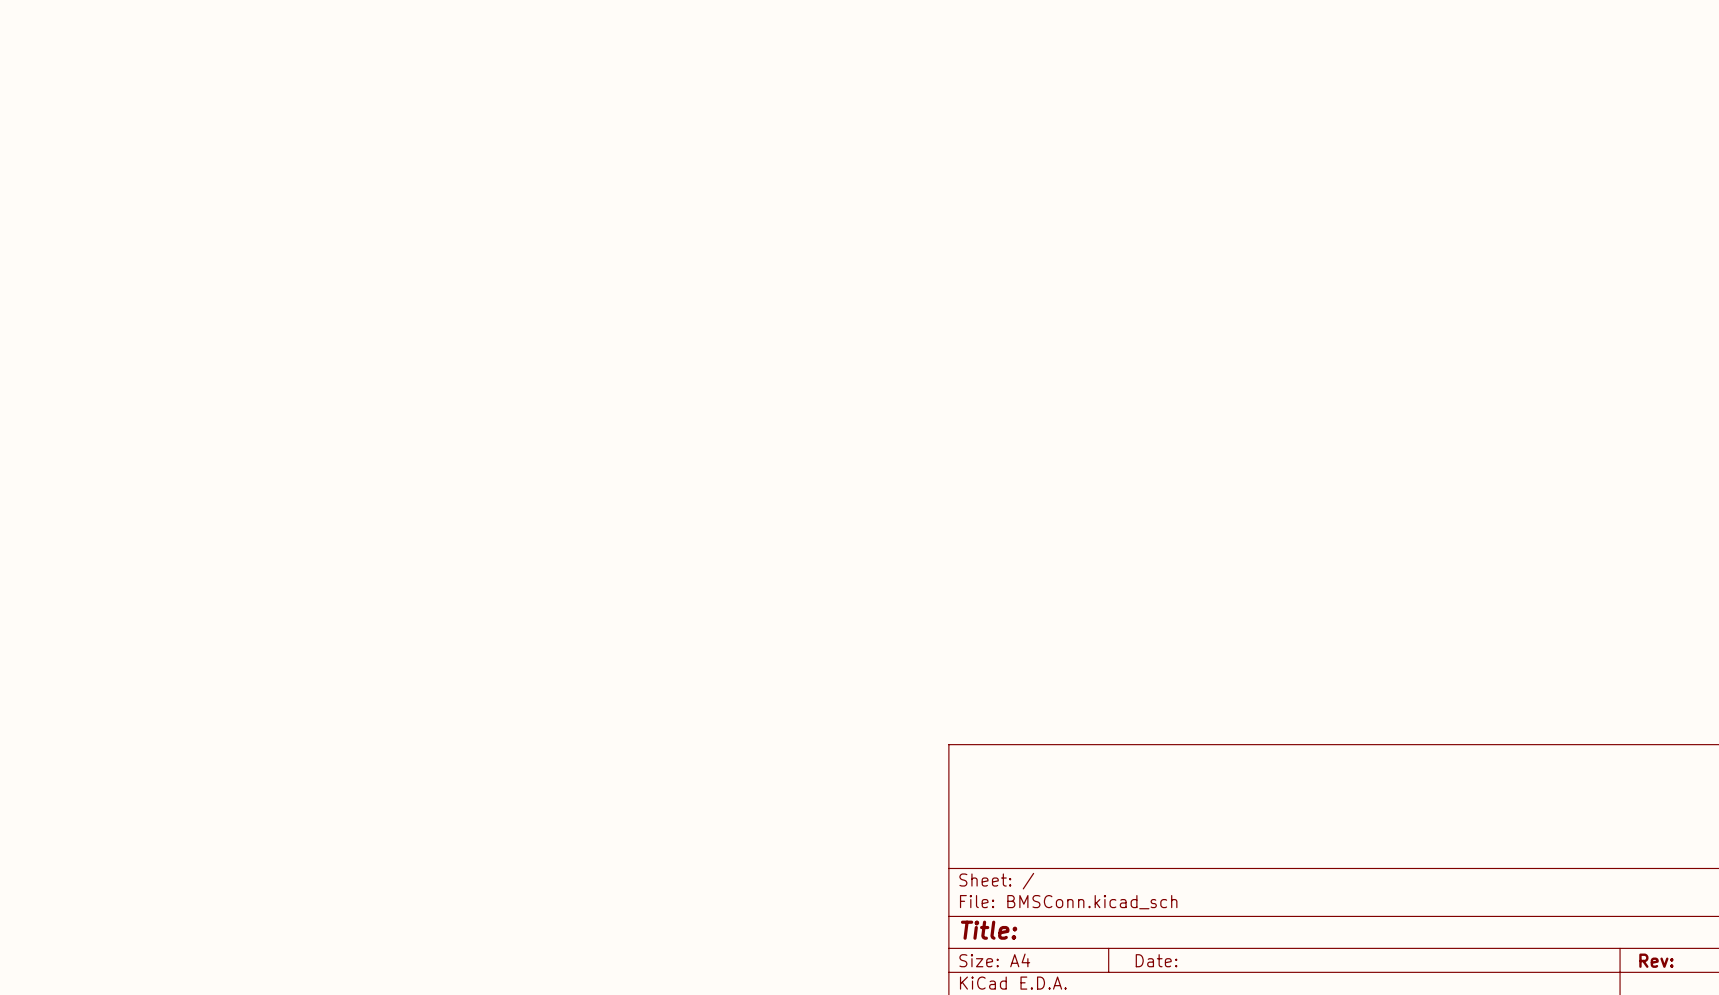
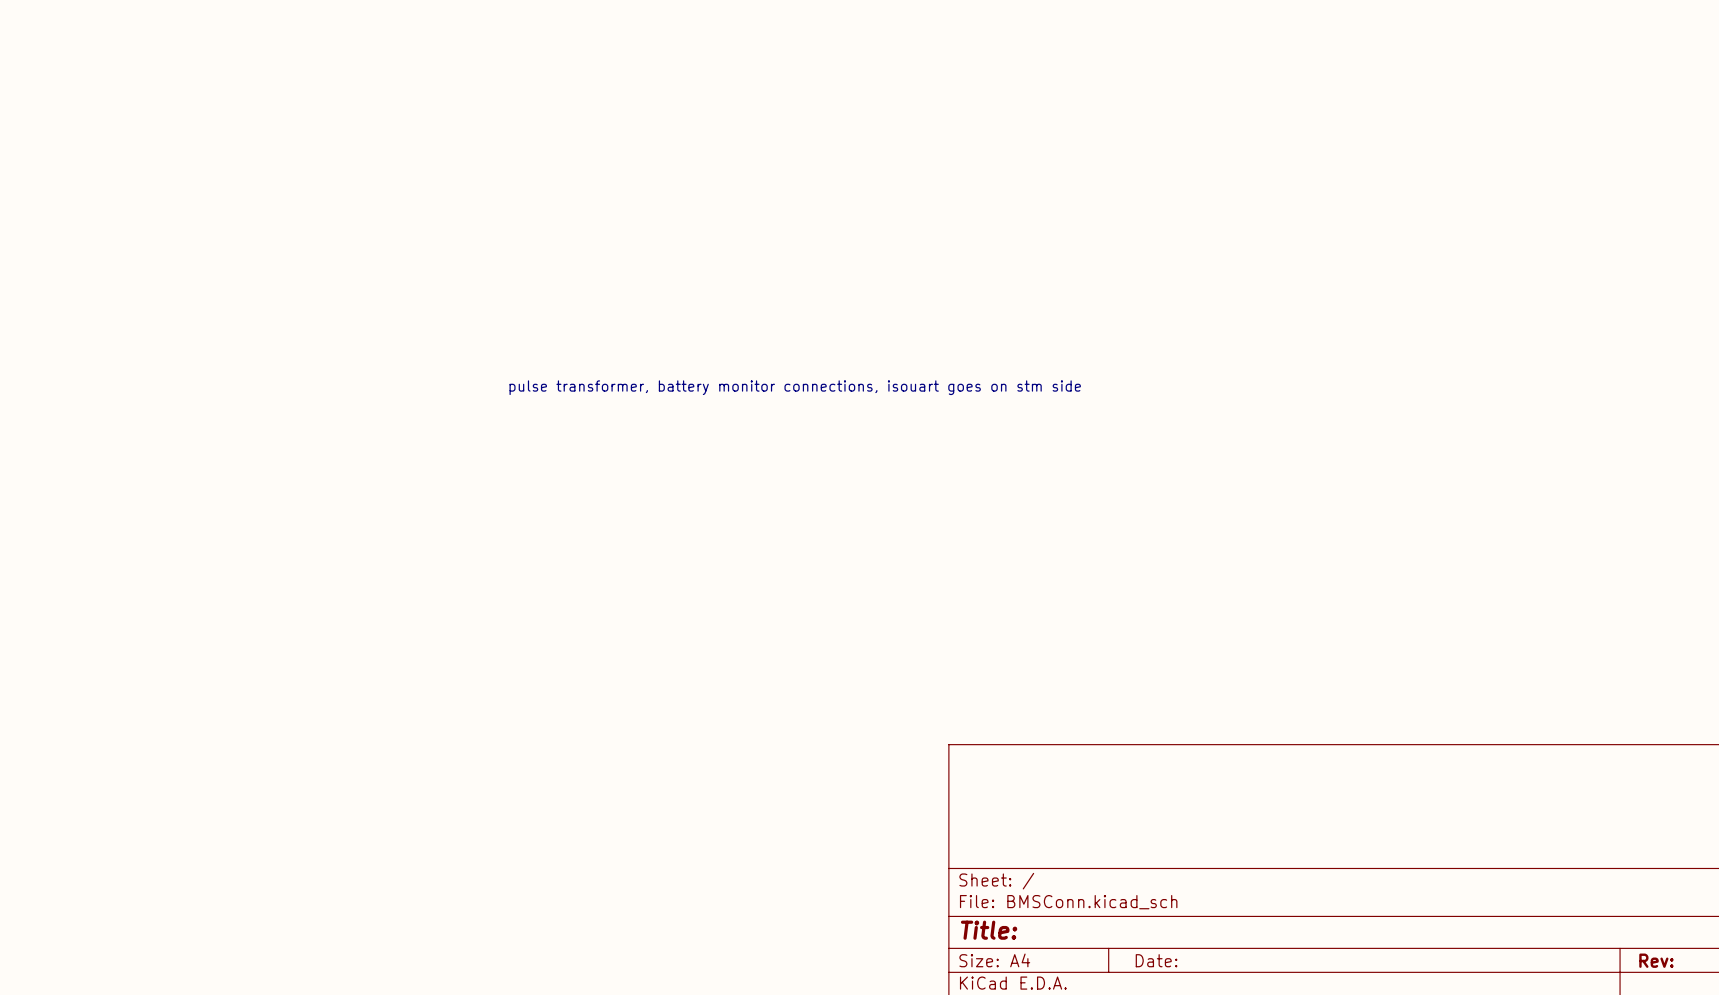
text: none -> pulse transformer, battery monitor connections, isouart goes on stm side (795, 387)

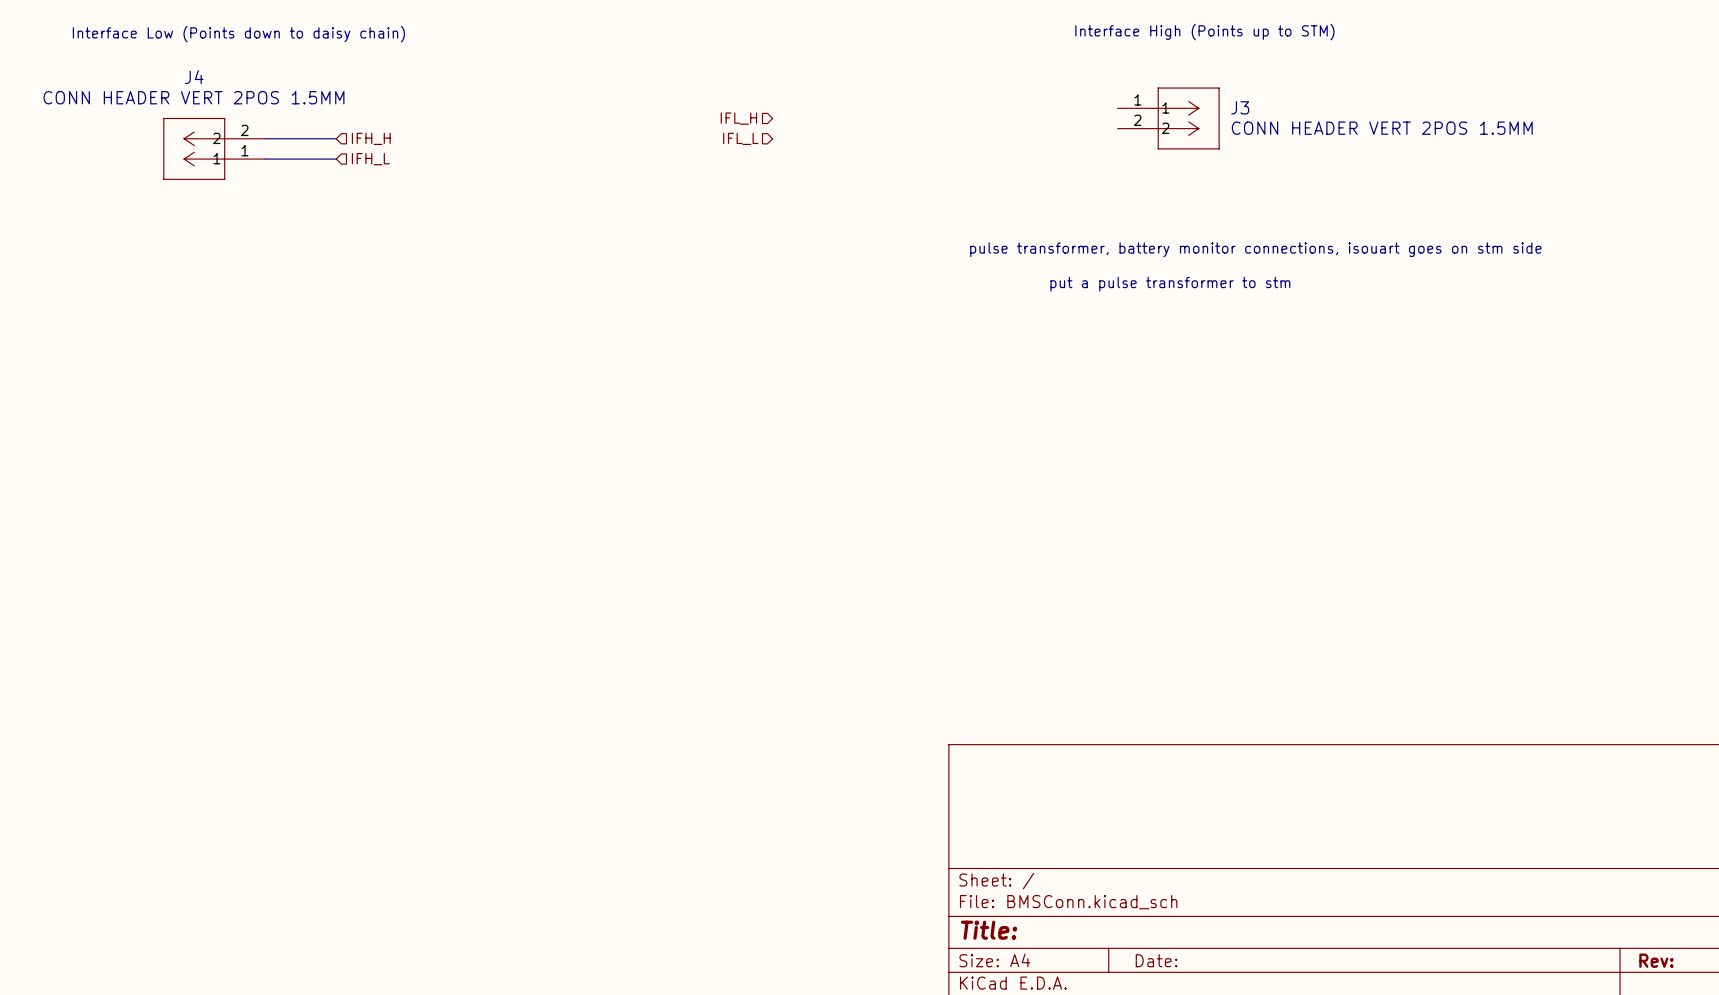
text: none -> Interface High (Points up to STM) (1204, 32)
text: none -> Interface Low (Points down to daisy chain) (238, 34)
hierarchical label: none -> IFL_H (738, 118)
J3: none -> CONN HEADER VERT 2POS 1.5MM (1168, 118)
wire: none -> (265, 138) (336, 138)
hierarchical label: none -> IFH_H (371, 138)
hierarchical label: none -> IFL_L (740, 138)
J4: none -> CONN HEADER VERT 2POS 1.5MM (214, 148)
wire: none -> (265, 159) (336, 159)
hierarchical label: none -> IFH_L (370, 159)
text: none -> pulse transformer, battery monitor connections, isouart goes on stm side (1255, 249)
text: none -> put a pulse transformer to stm (1170, 284)
text: pulse transformer, battery monitor connections, isouart goes on stm side (795, 387) -> none

